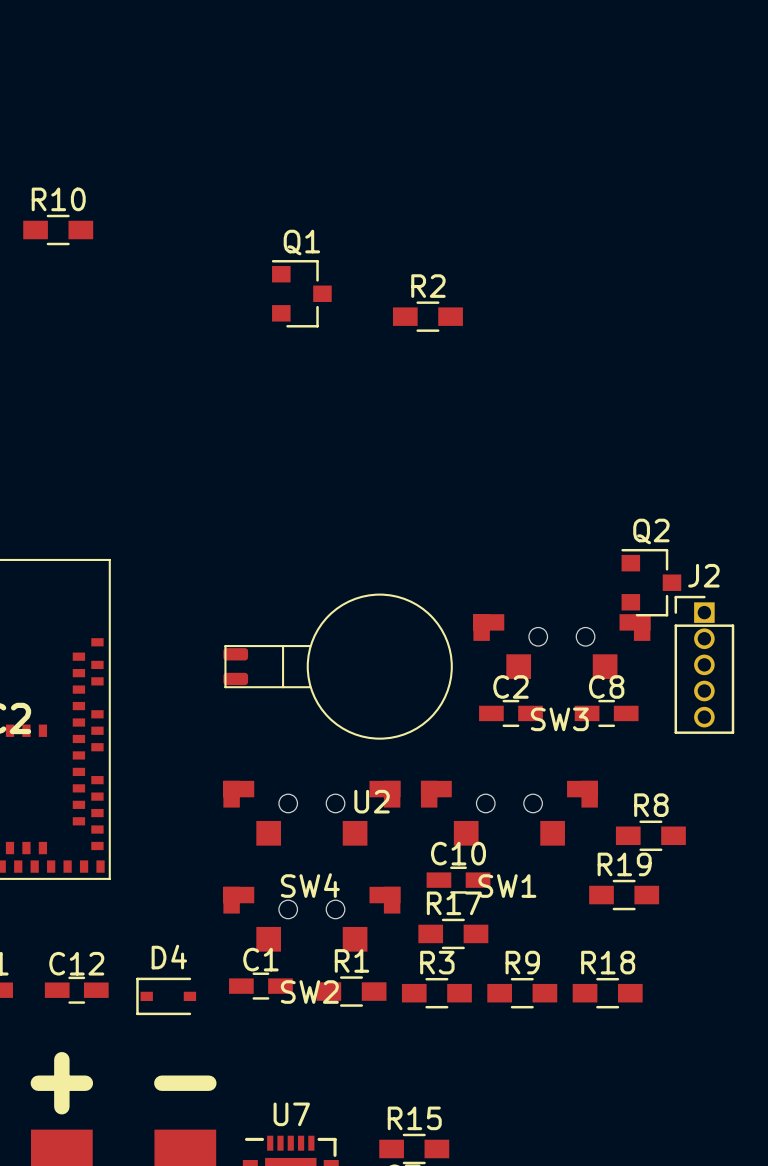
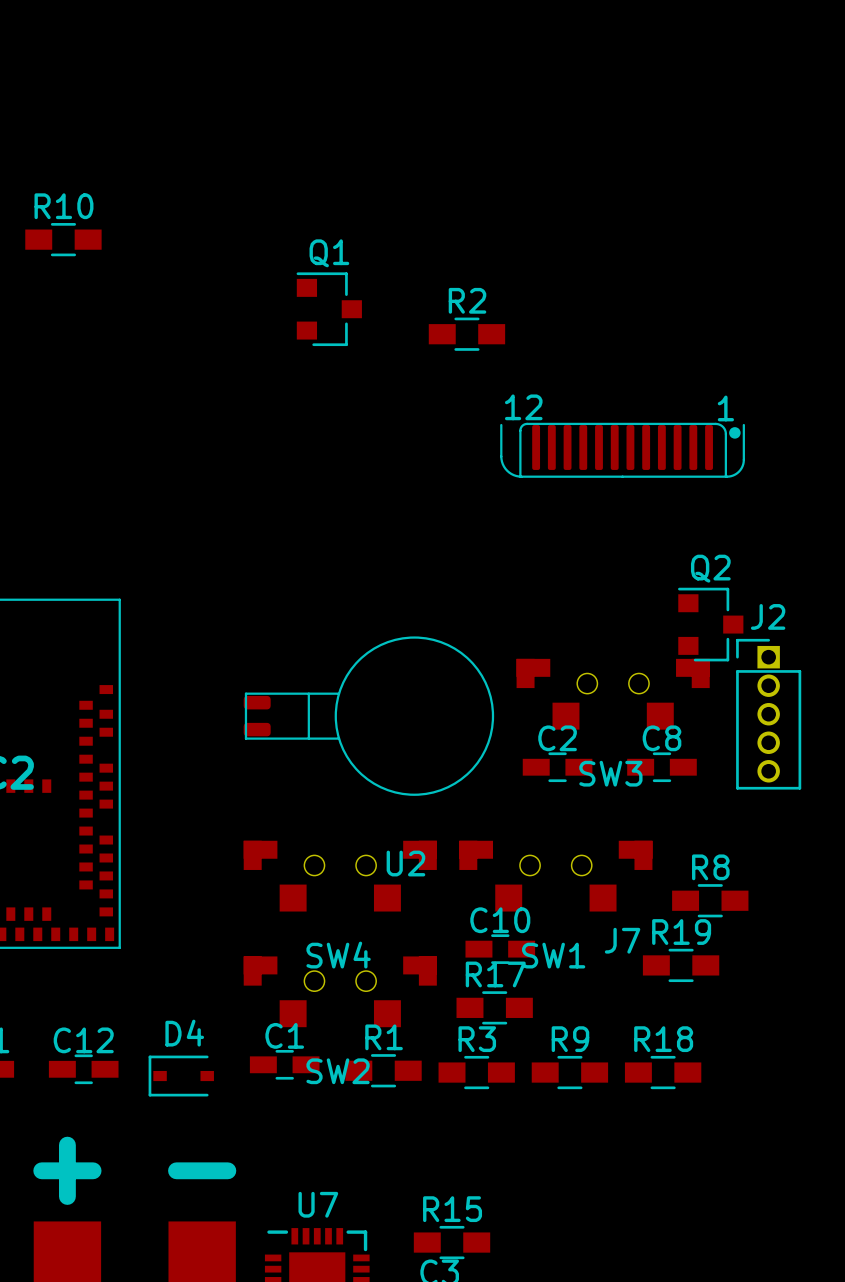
J7: none -> (622, 450)

